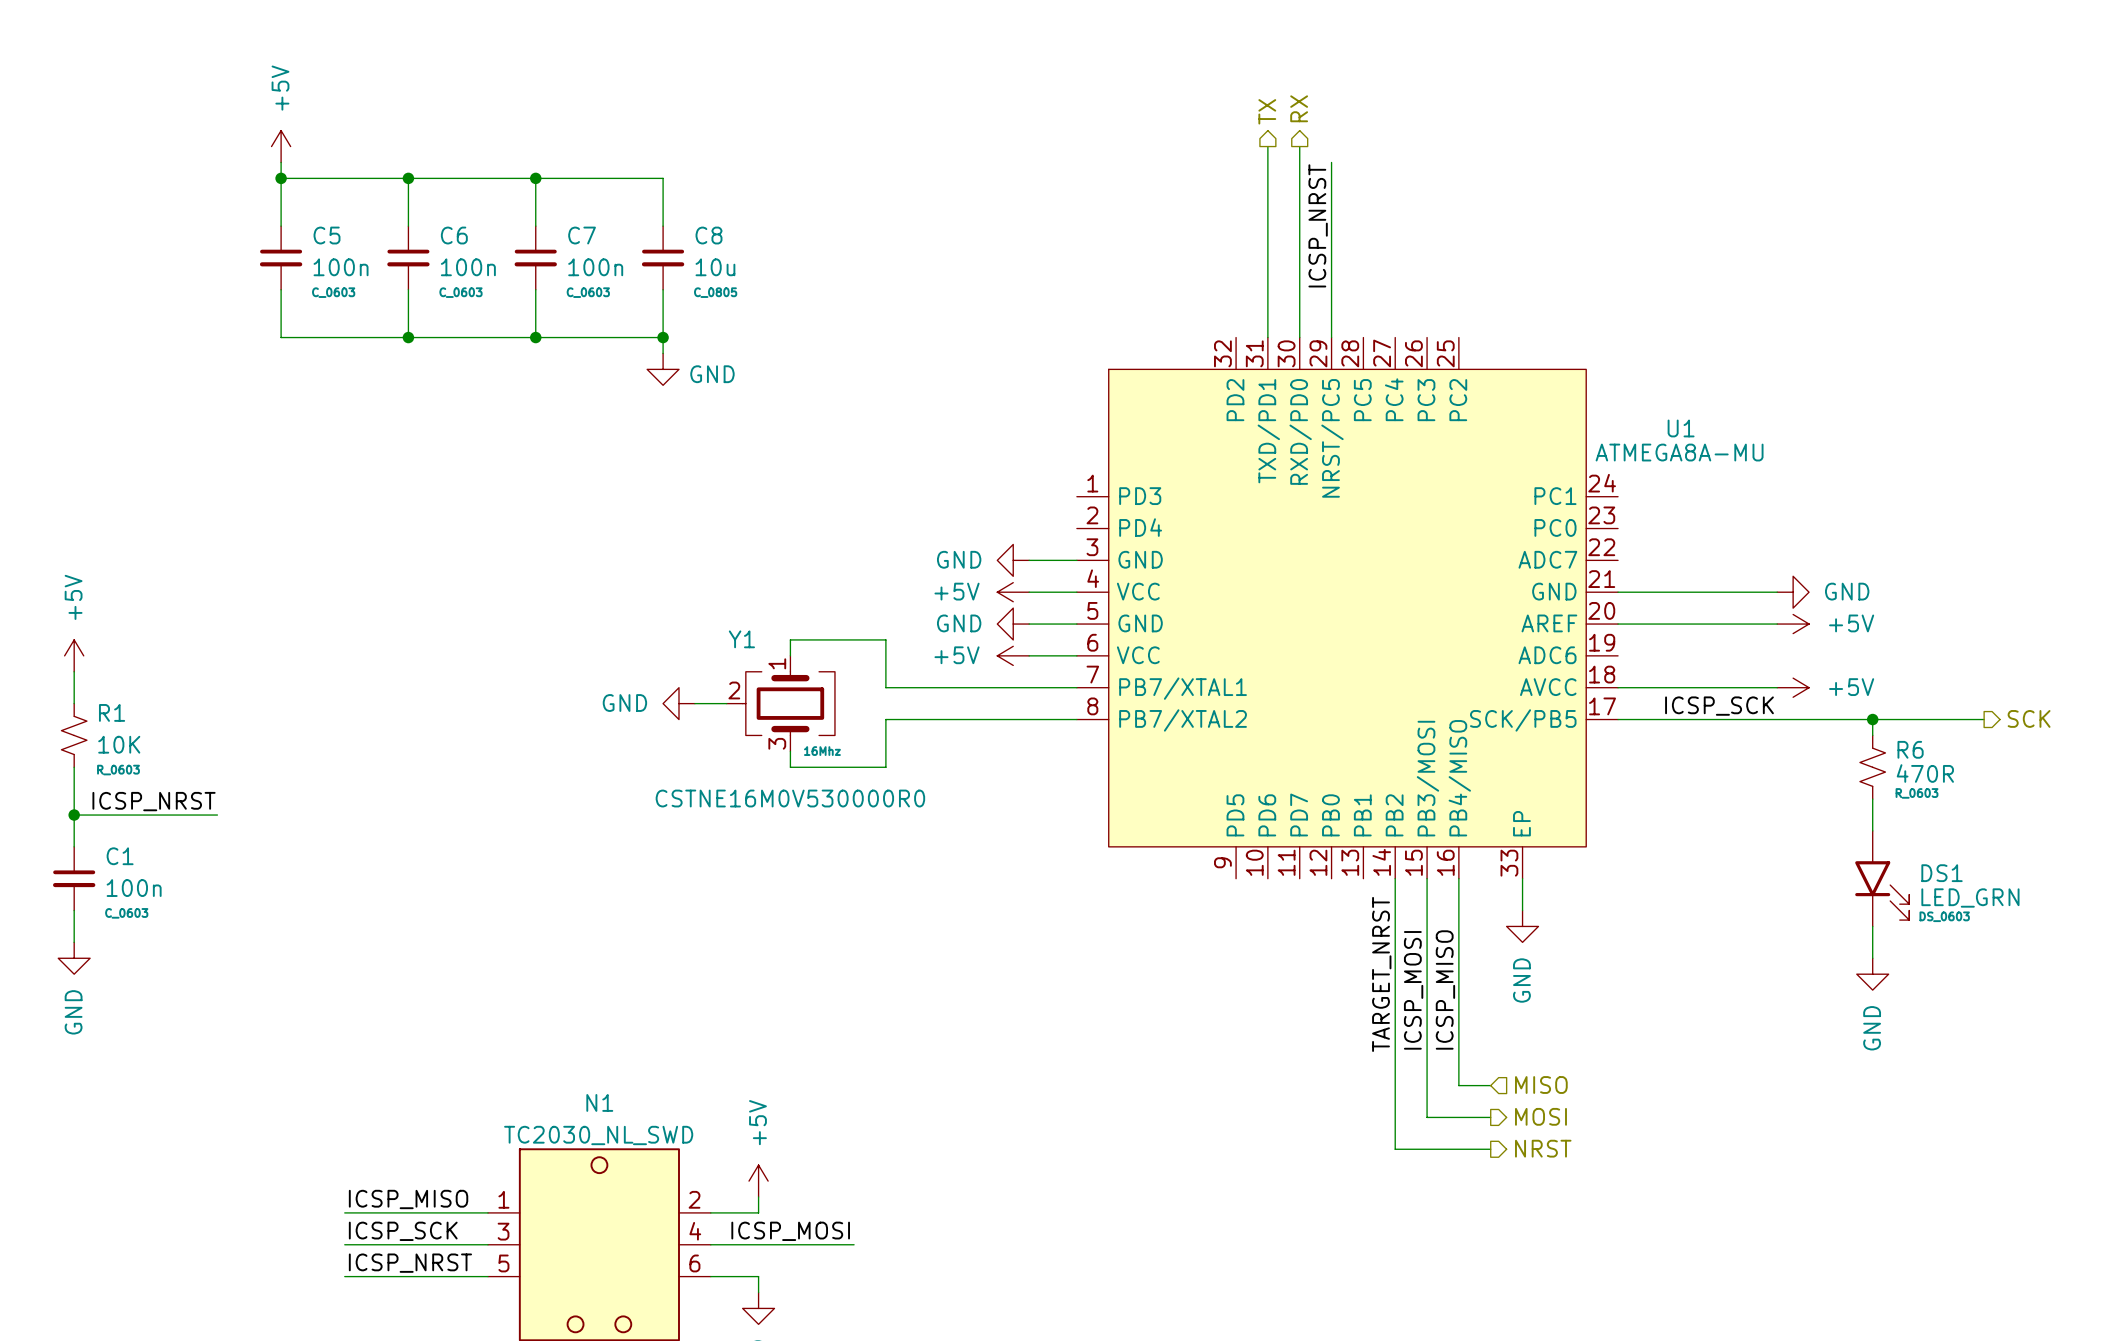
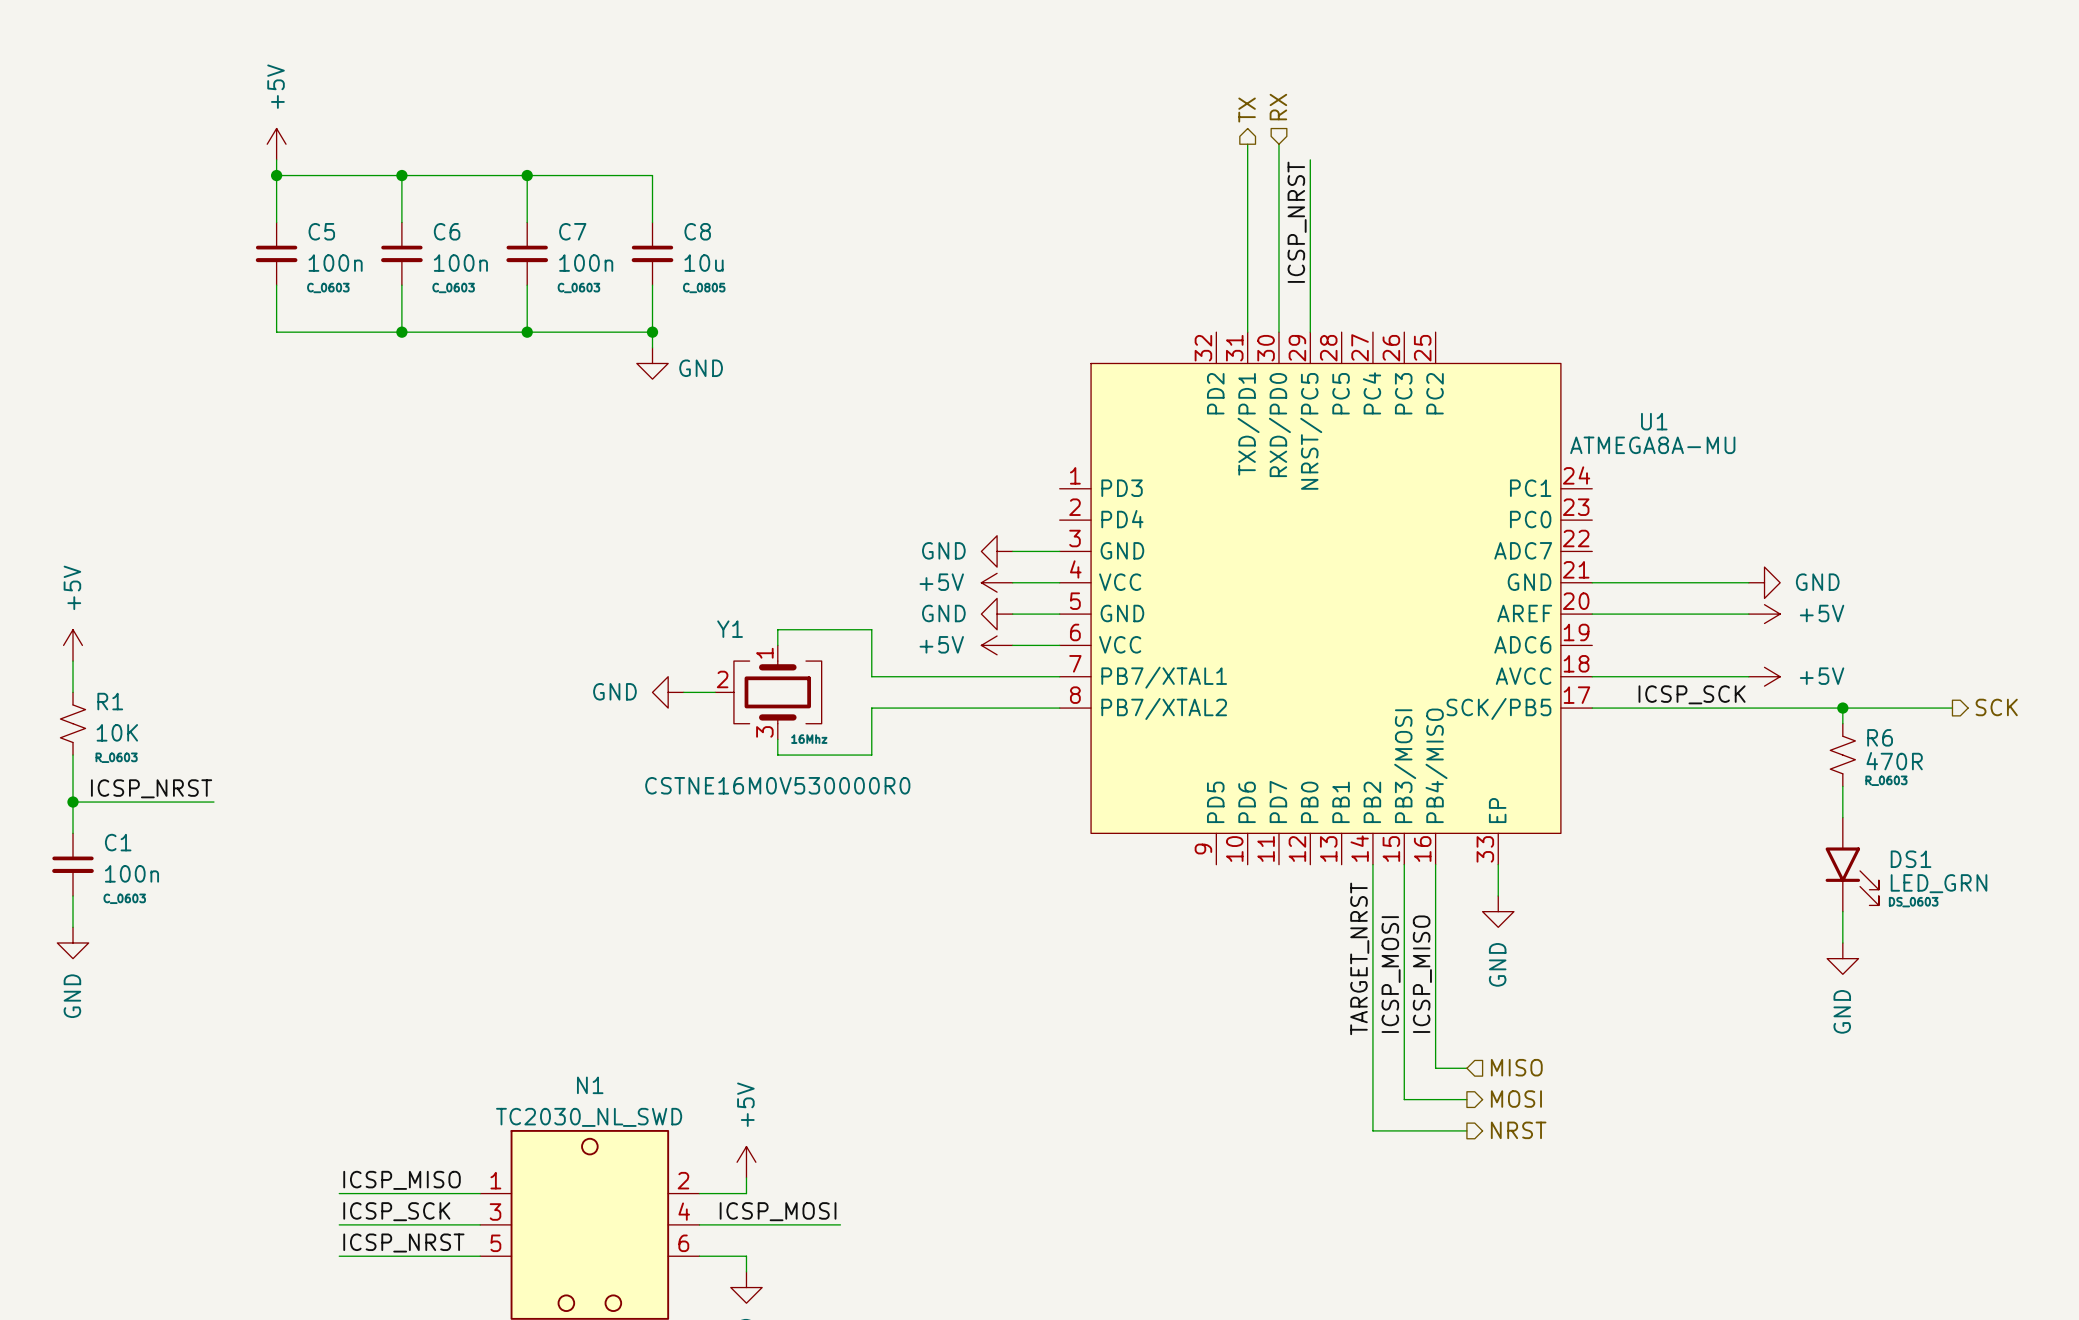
hierarchical label shape: output (1299, 108) -> input (1278, 107)

